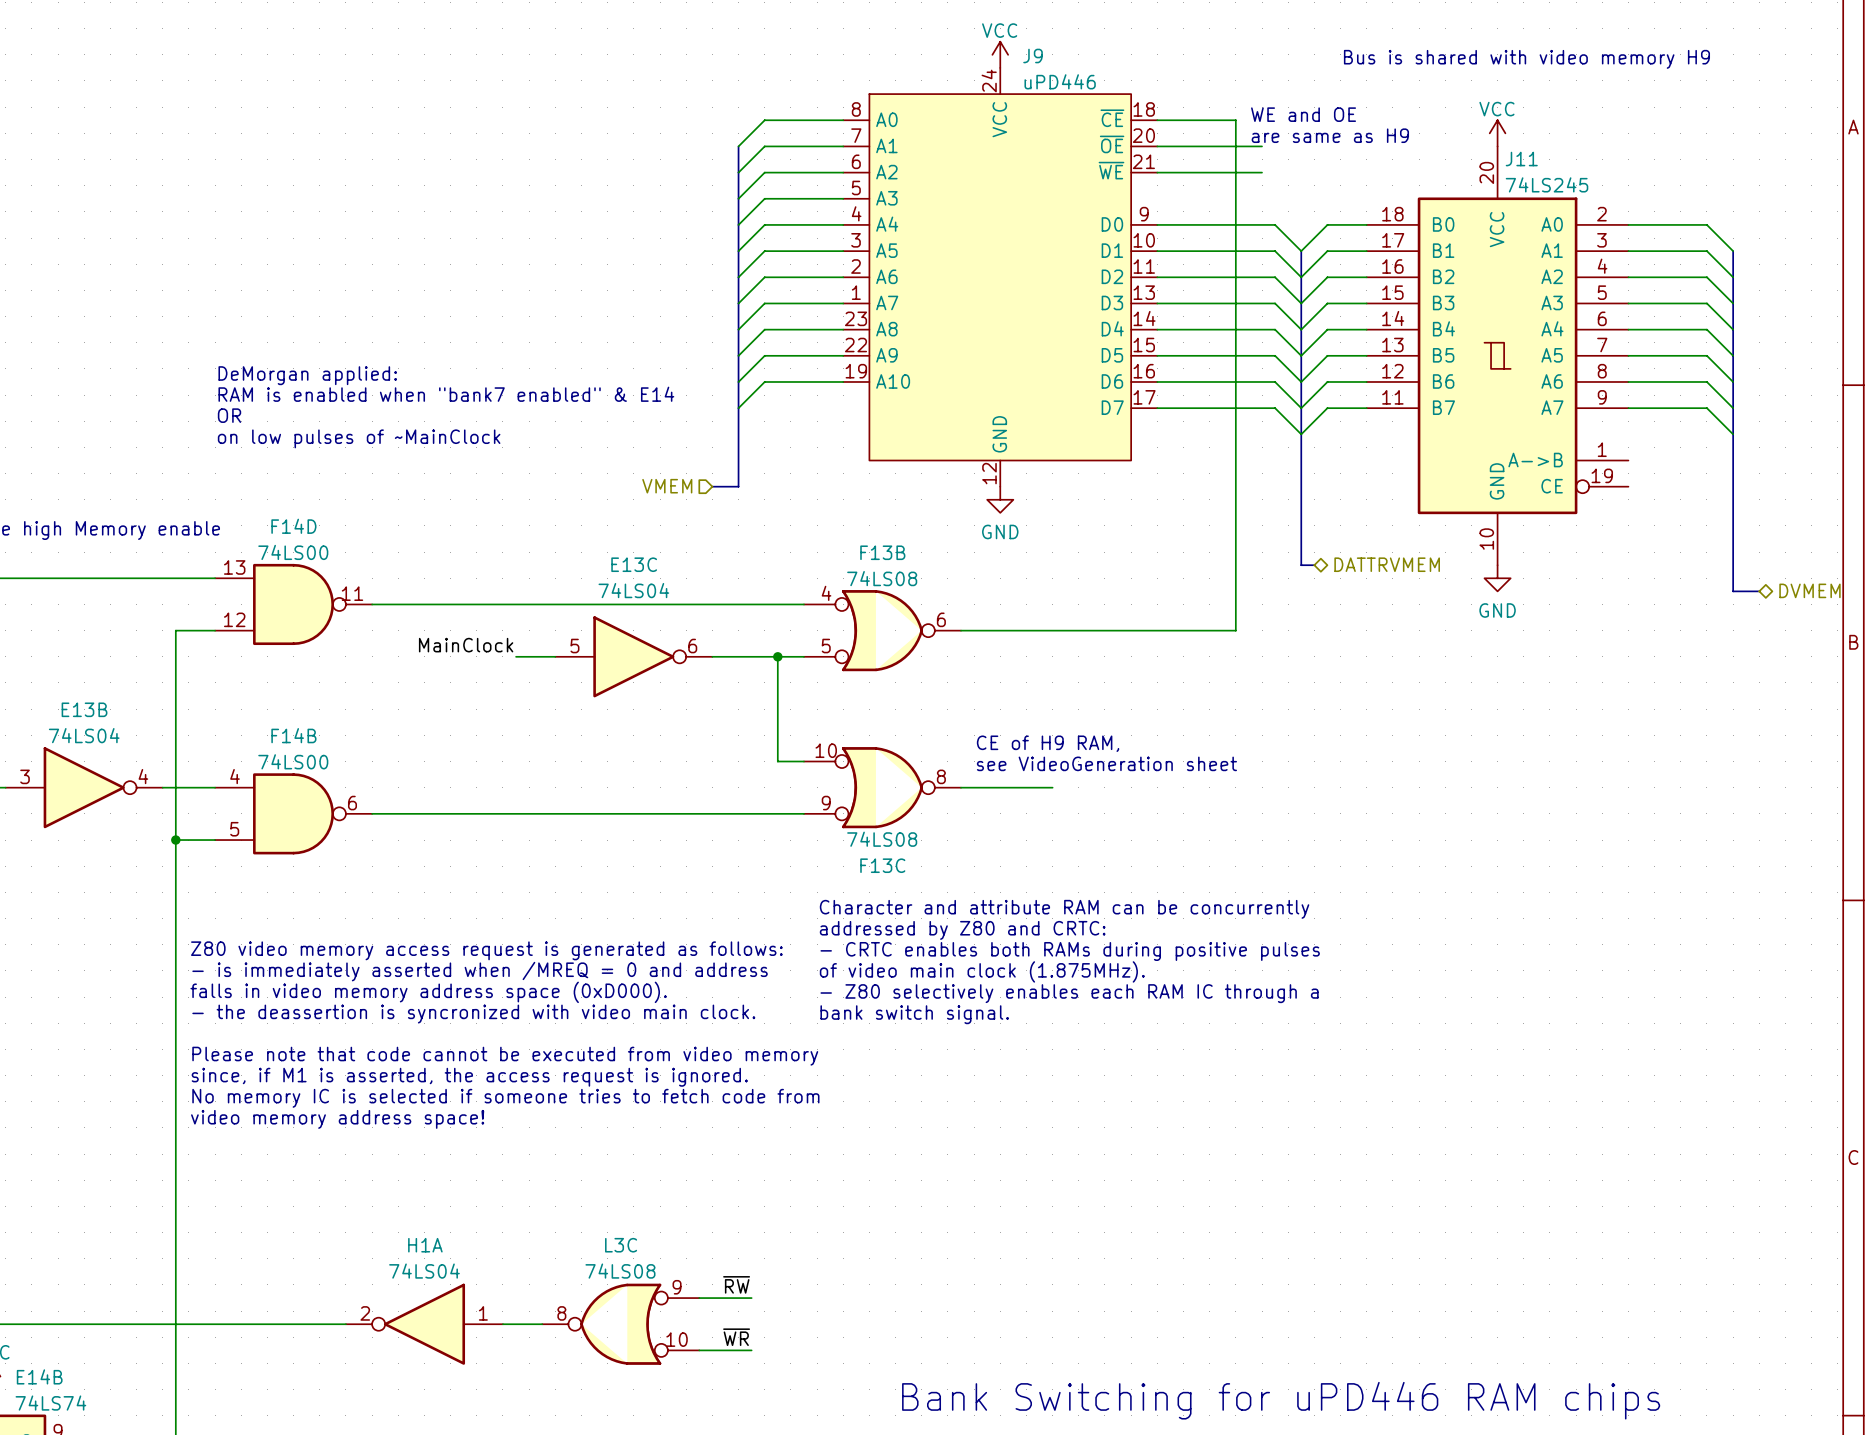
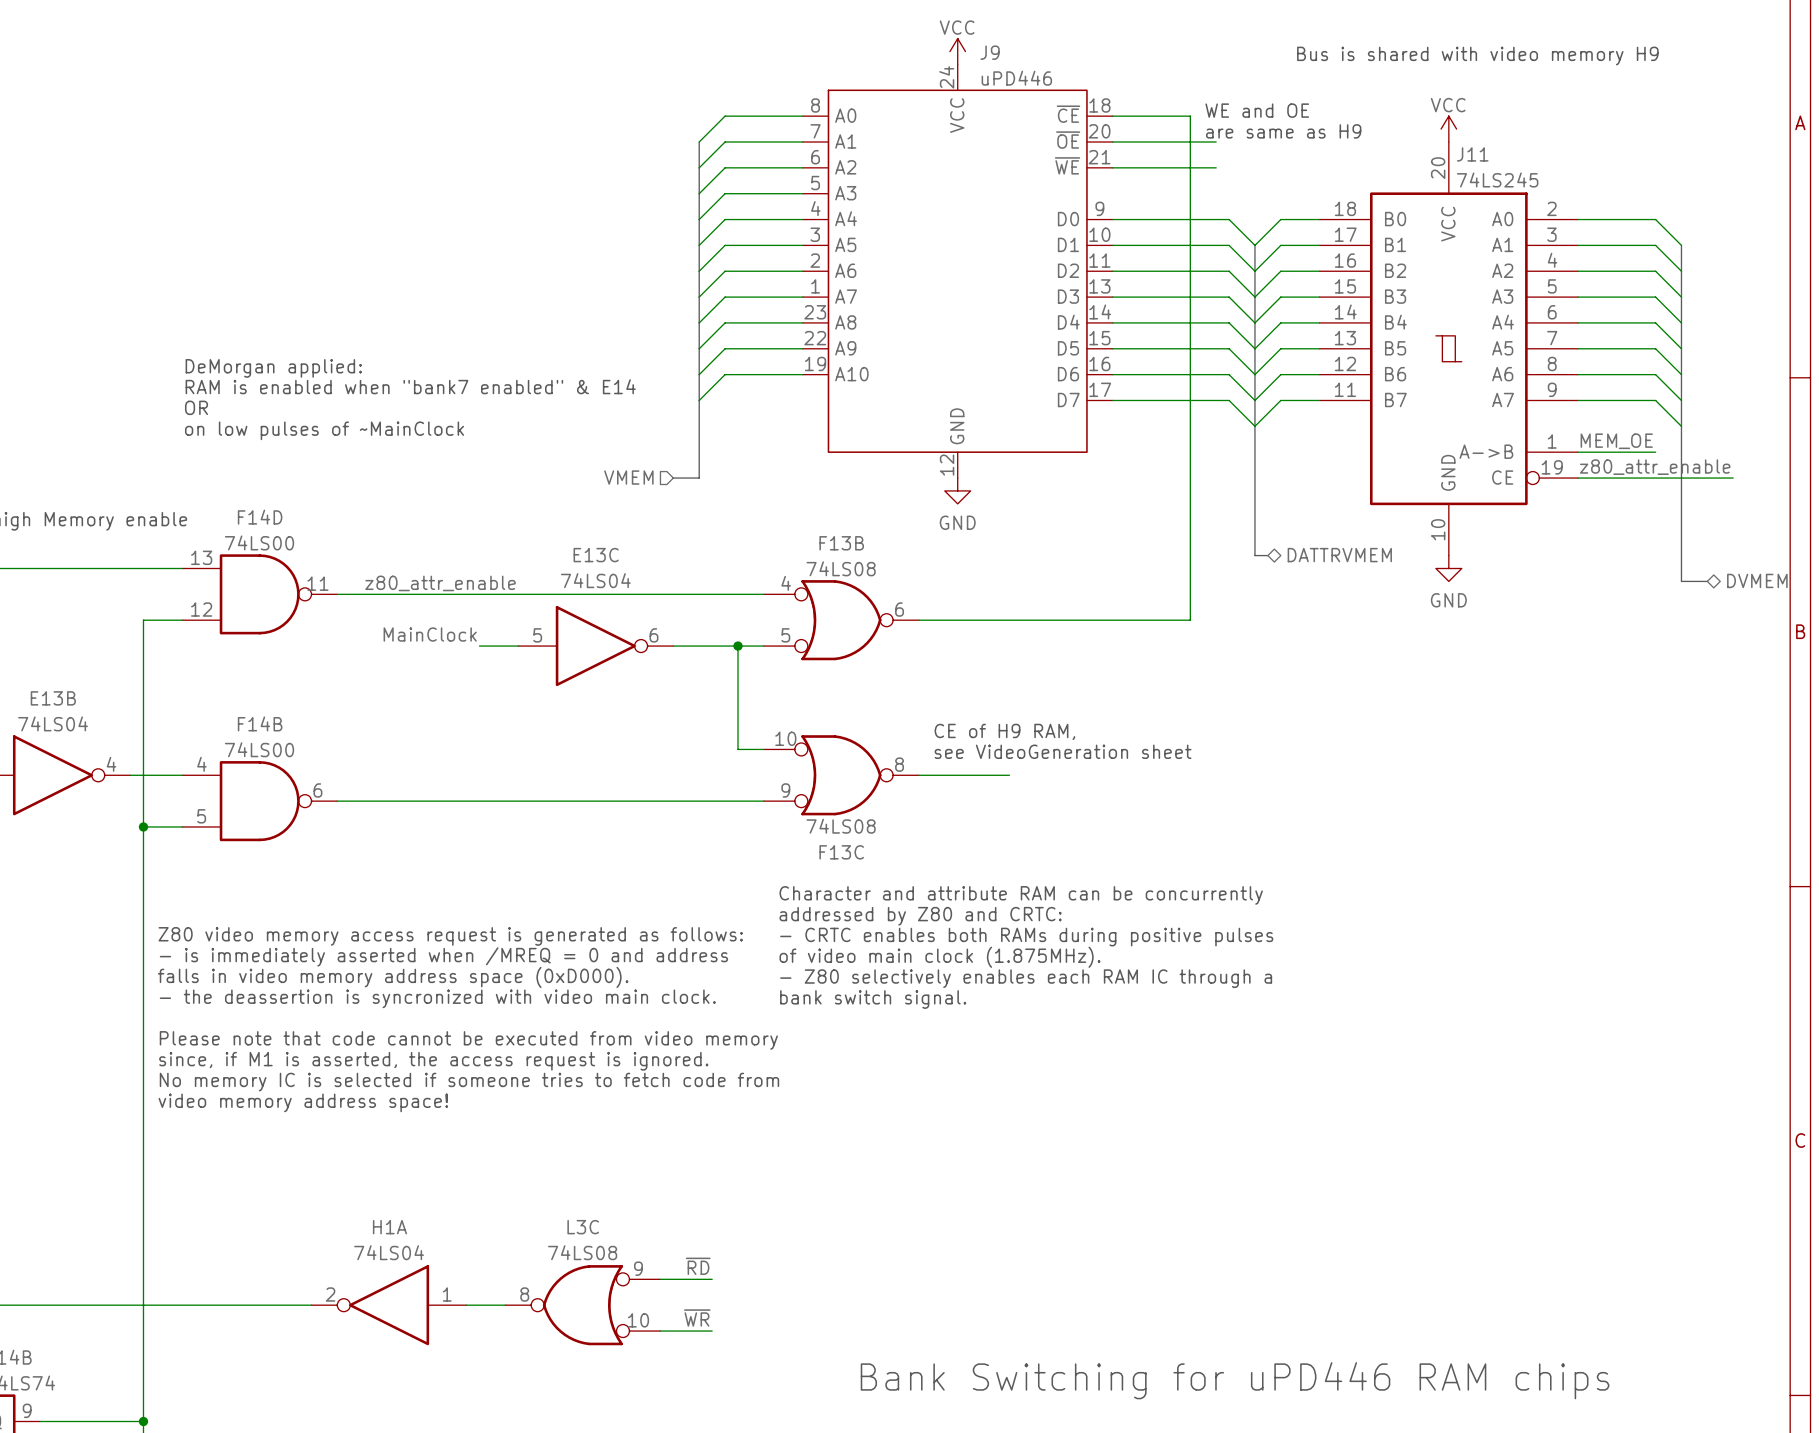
label: none -> MEM_OE (1616, 441)
wire: none -> (1578, 452) (1655, 452)
label: none -> z80_attr_enable (1655, 467)
wire: none -> (1578, 478) (1733, 478)
label: none -> z80_attr_enable (440, 583)
label: ~{RW} (736, 1284) -> ~{RD} (698, 1266)

